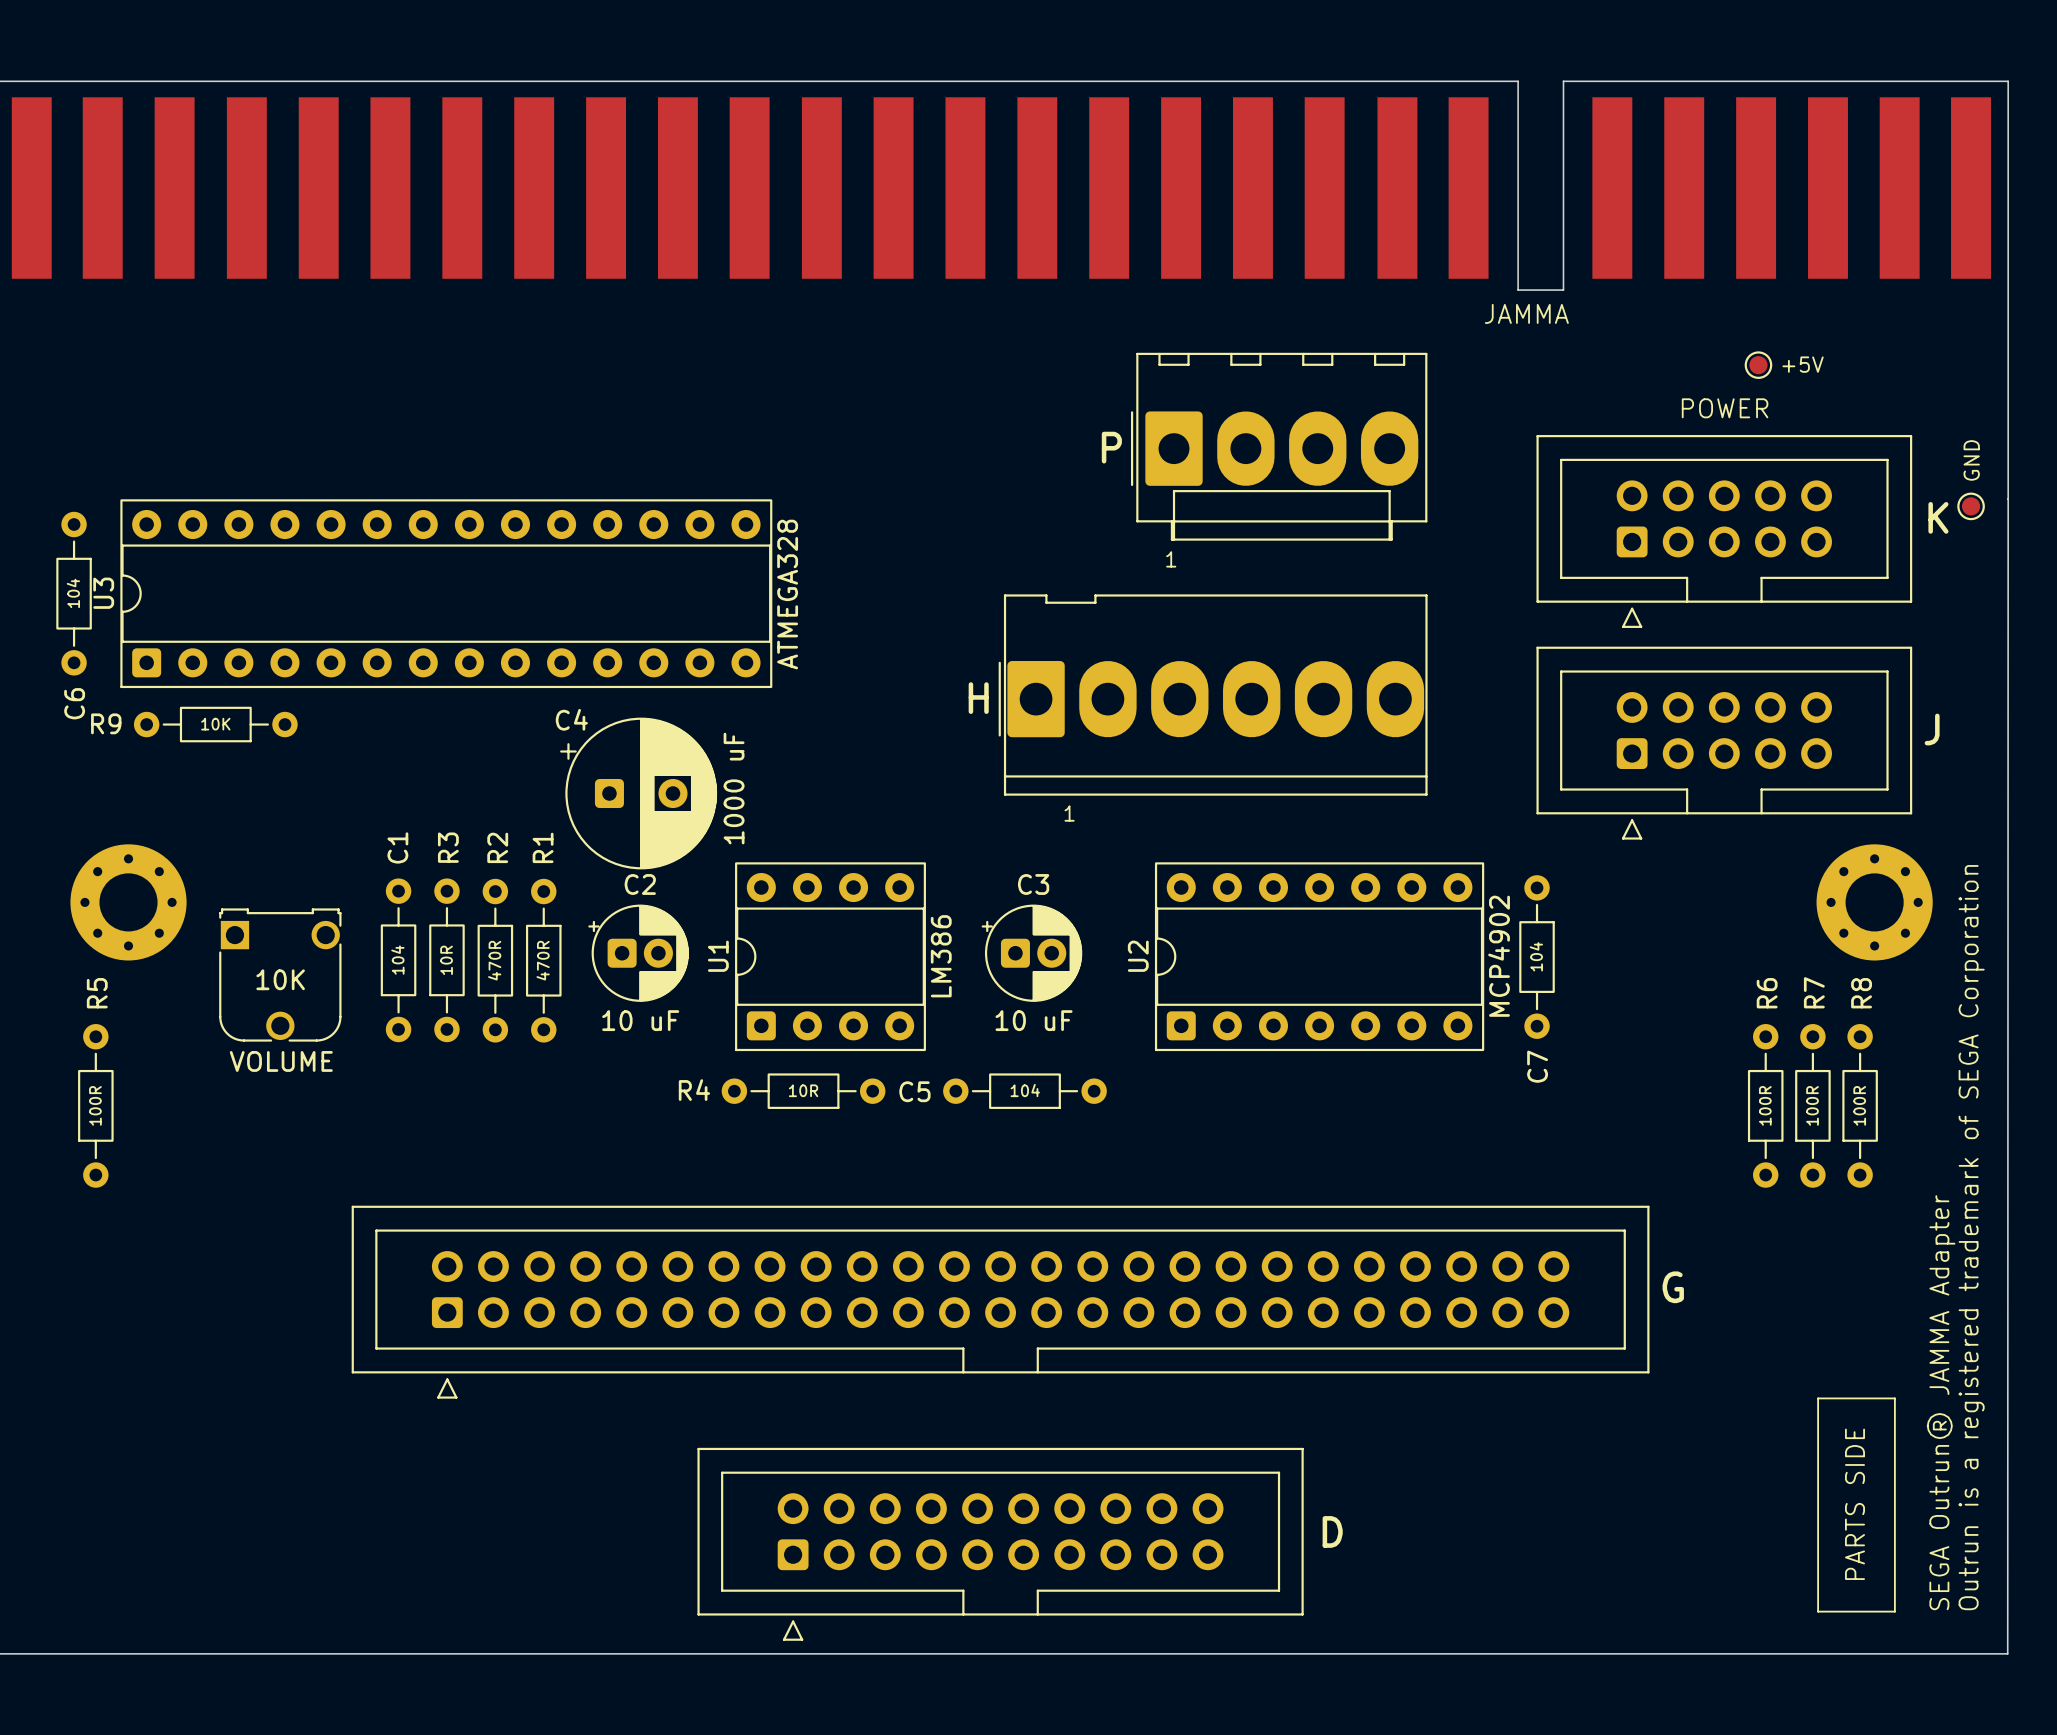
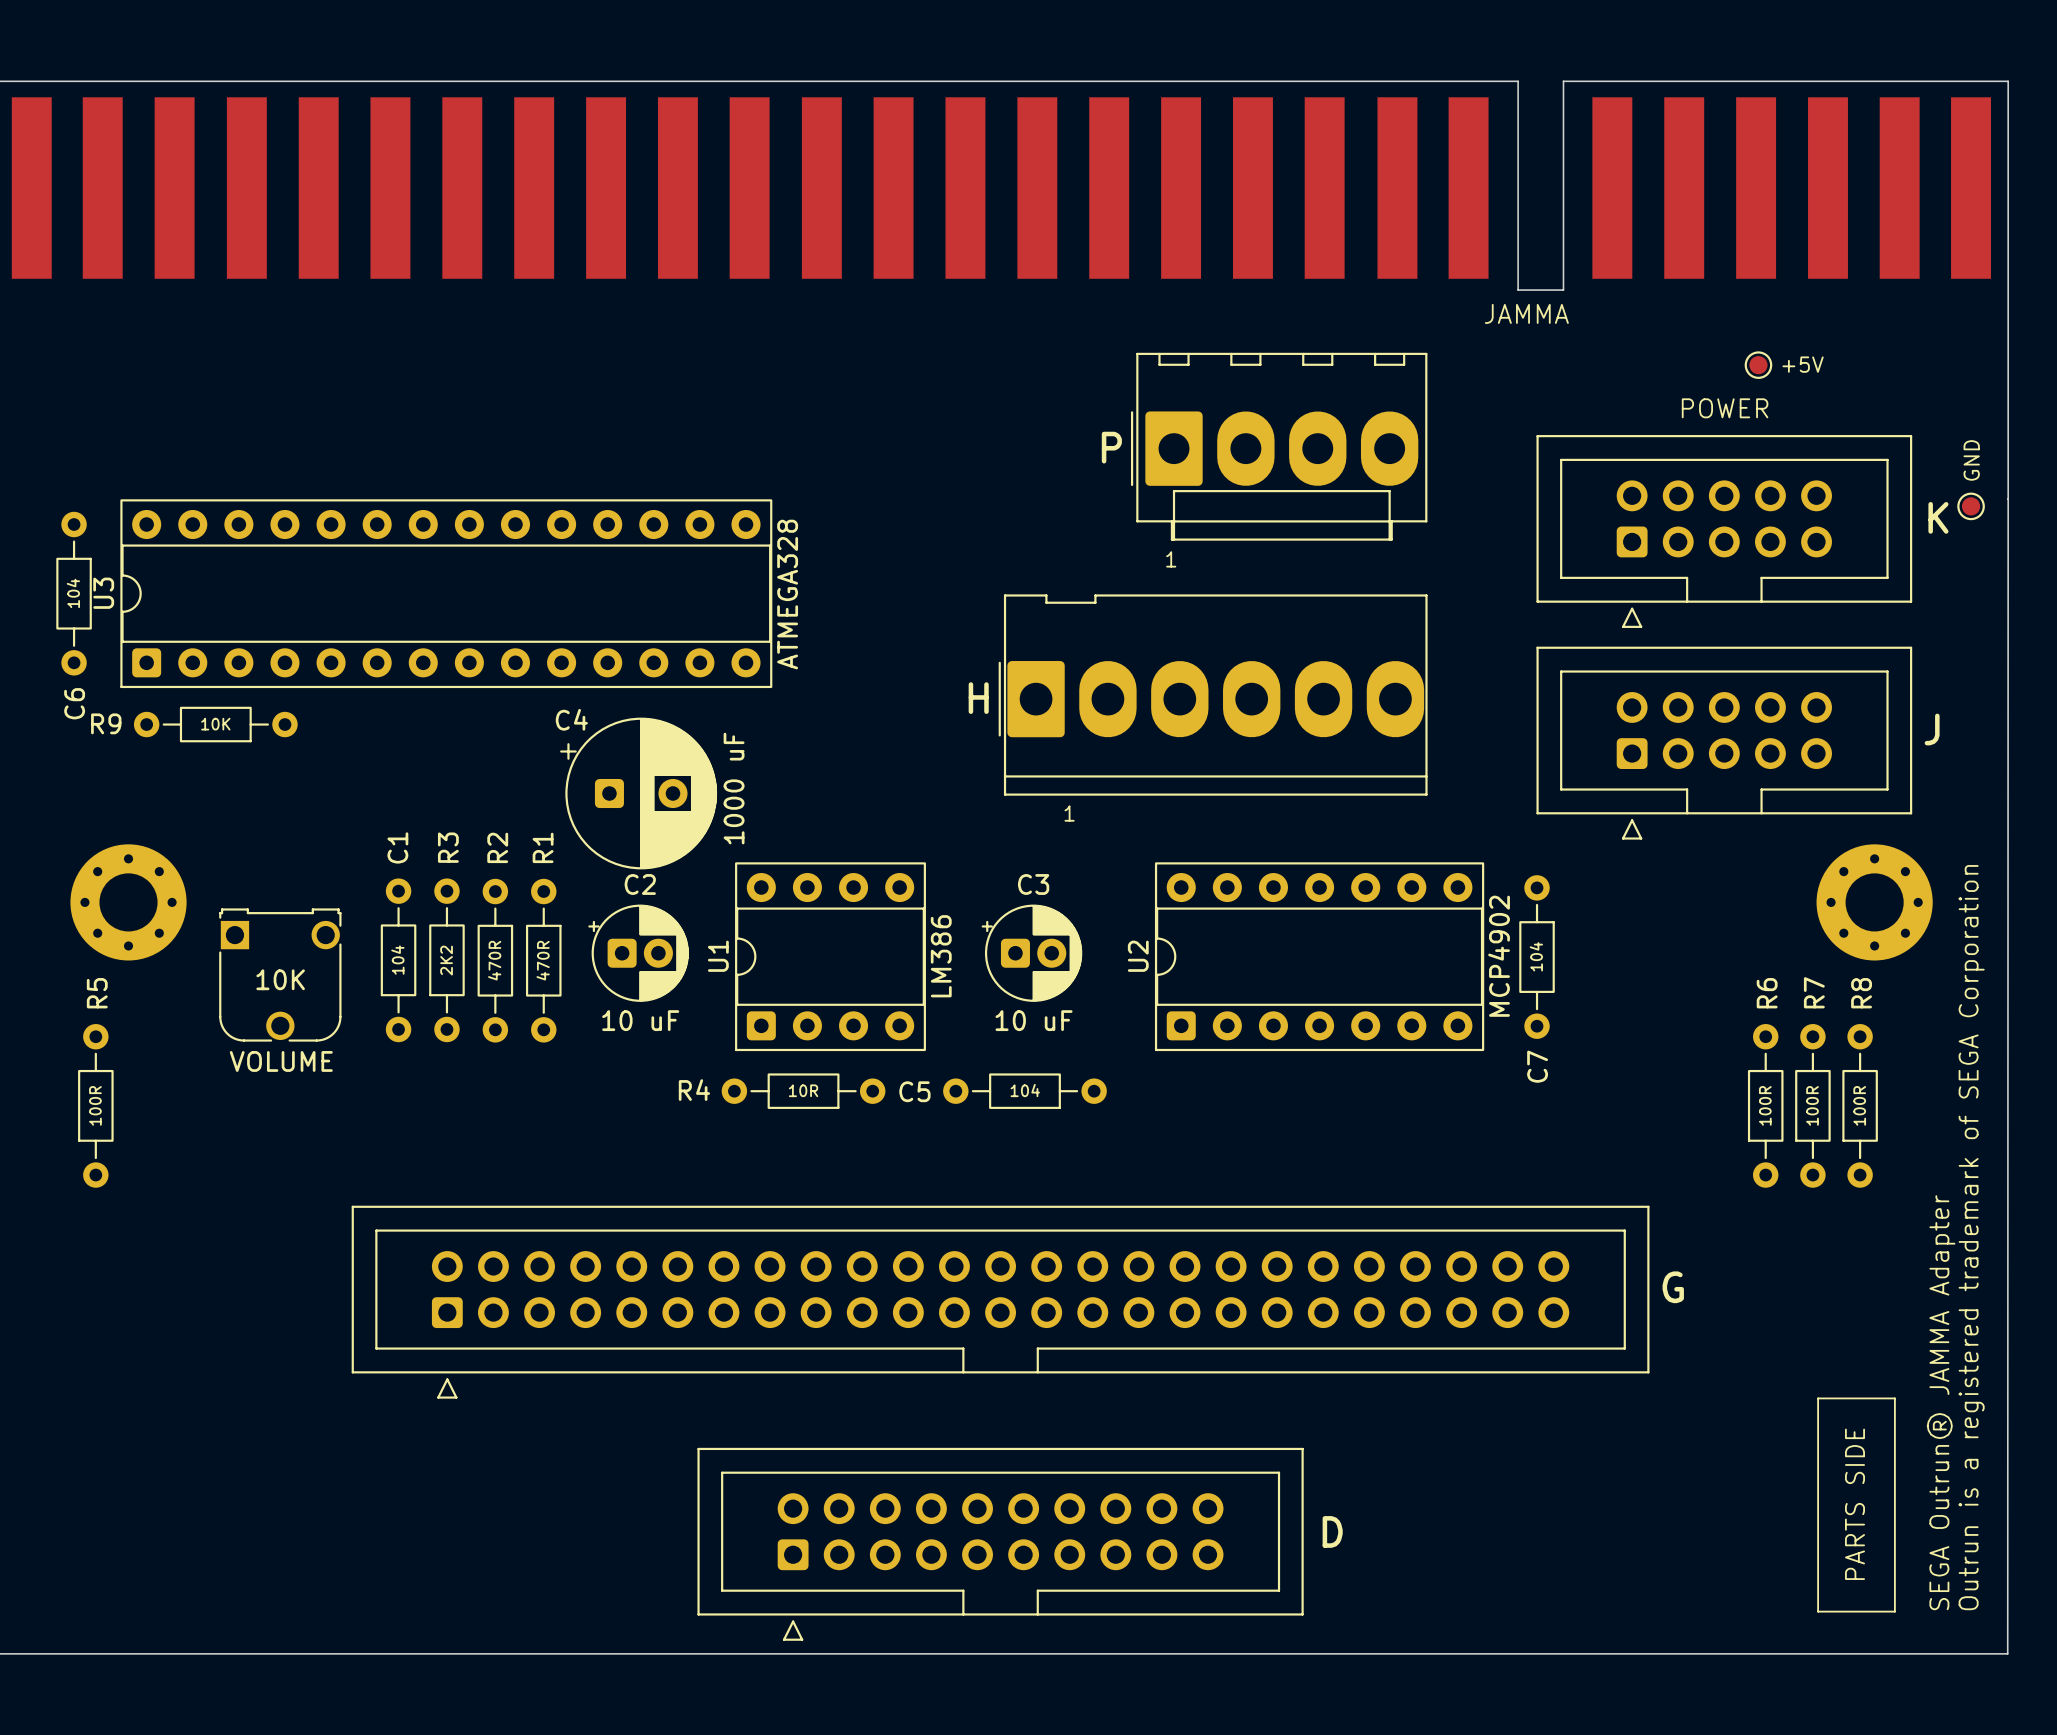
R3 value: 10R (446, 960) -> 2K2 (446, 960)

